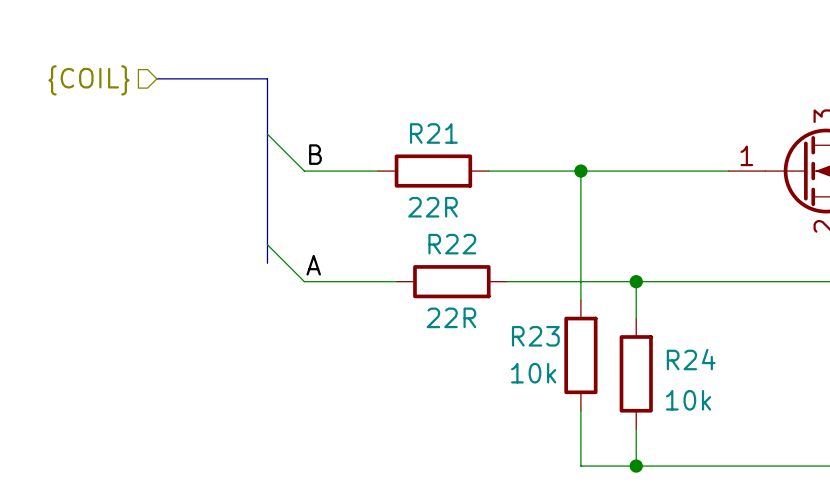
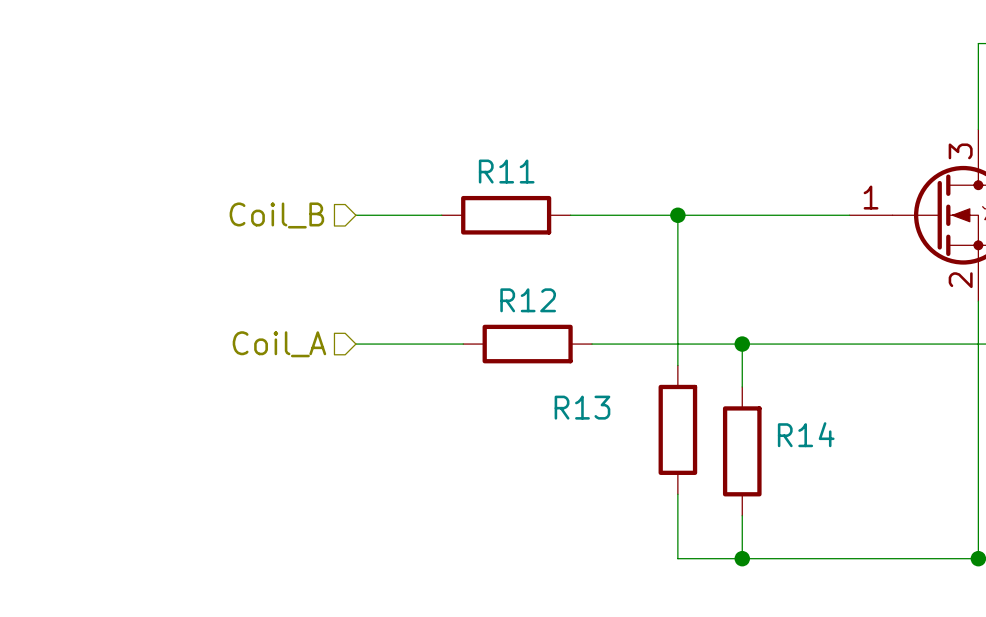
bus: (156, 78) (267, 78) (267, 263) -> none
hierarchical label: {COIL} (88, 80) -> none
R21 name: R21 (433, 133) -> R11 (506, 171)
wire: (267, 134) (304, 171) -> none
label: B (315, 154) -> none
hierarchical label: none -> Coil_B (276, 215)
R21 value: 22R (432, 207) -> none
wire: (267, 244) (304, 281) -> none
R22 name: R22 (452, 244) -> R12 (528, 300)
label: A (313, 265) -> none
hierarchical label: none -> Coil_A (279, 344)
R22 value: 22R (451, 317) -> none
R23 name: R23 (535, 336) -> R13 (582, 407)
R24 name: R24 (691, 359) -> R14 (806, 434)
R23 value: 10k (533, 373) -> none
R24 value: 10k (688, 400) -> none

